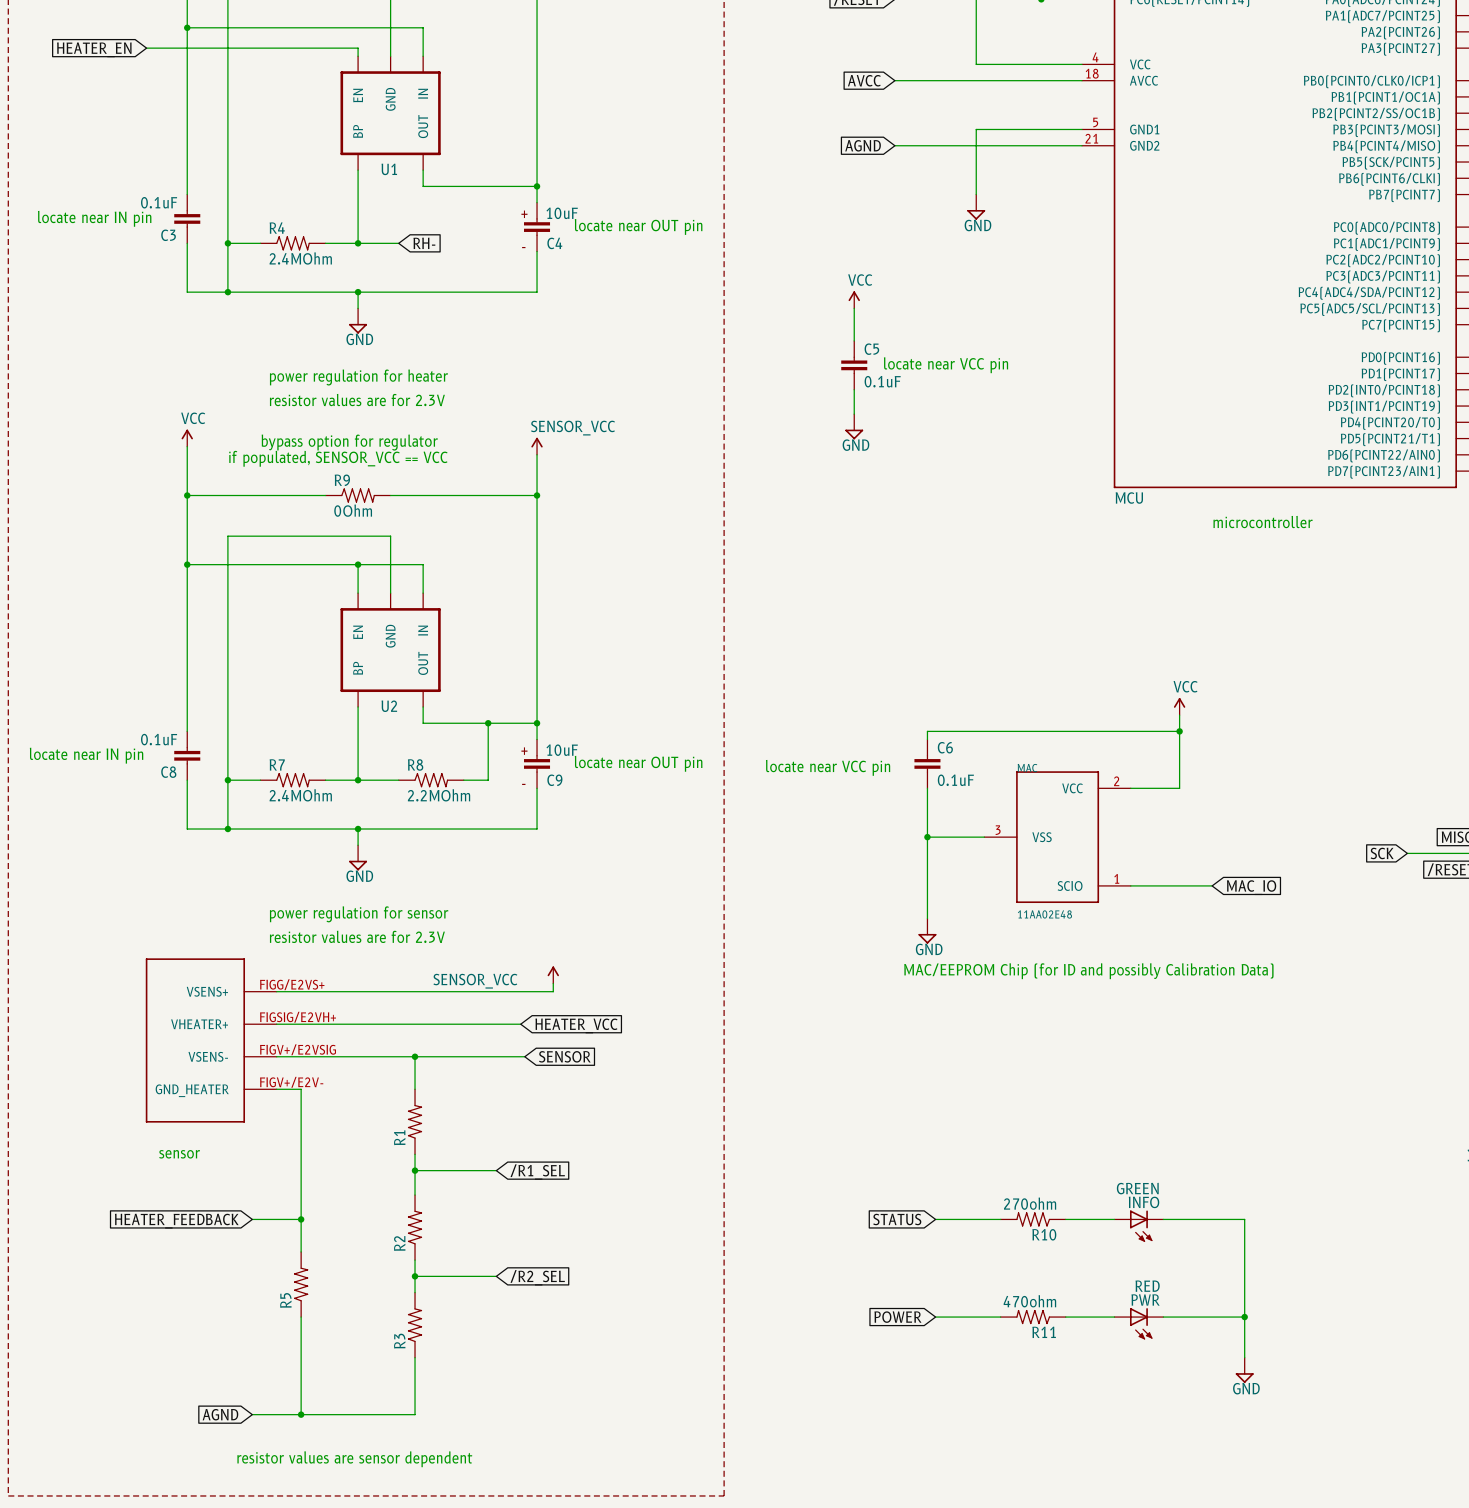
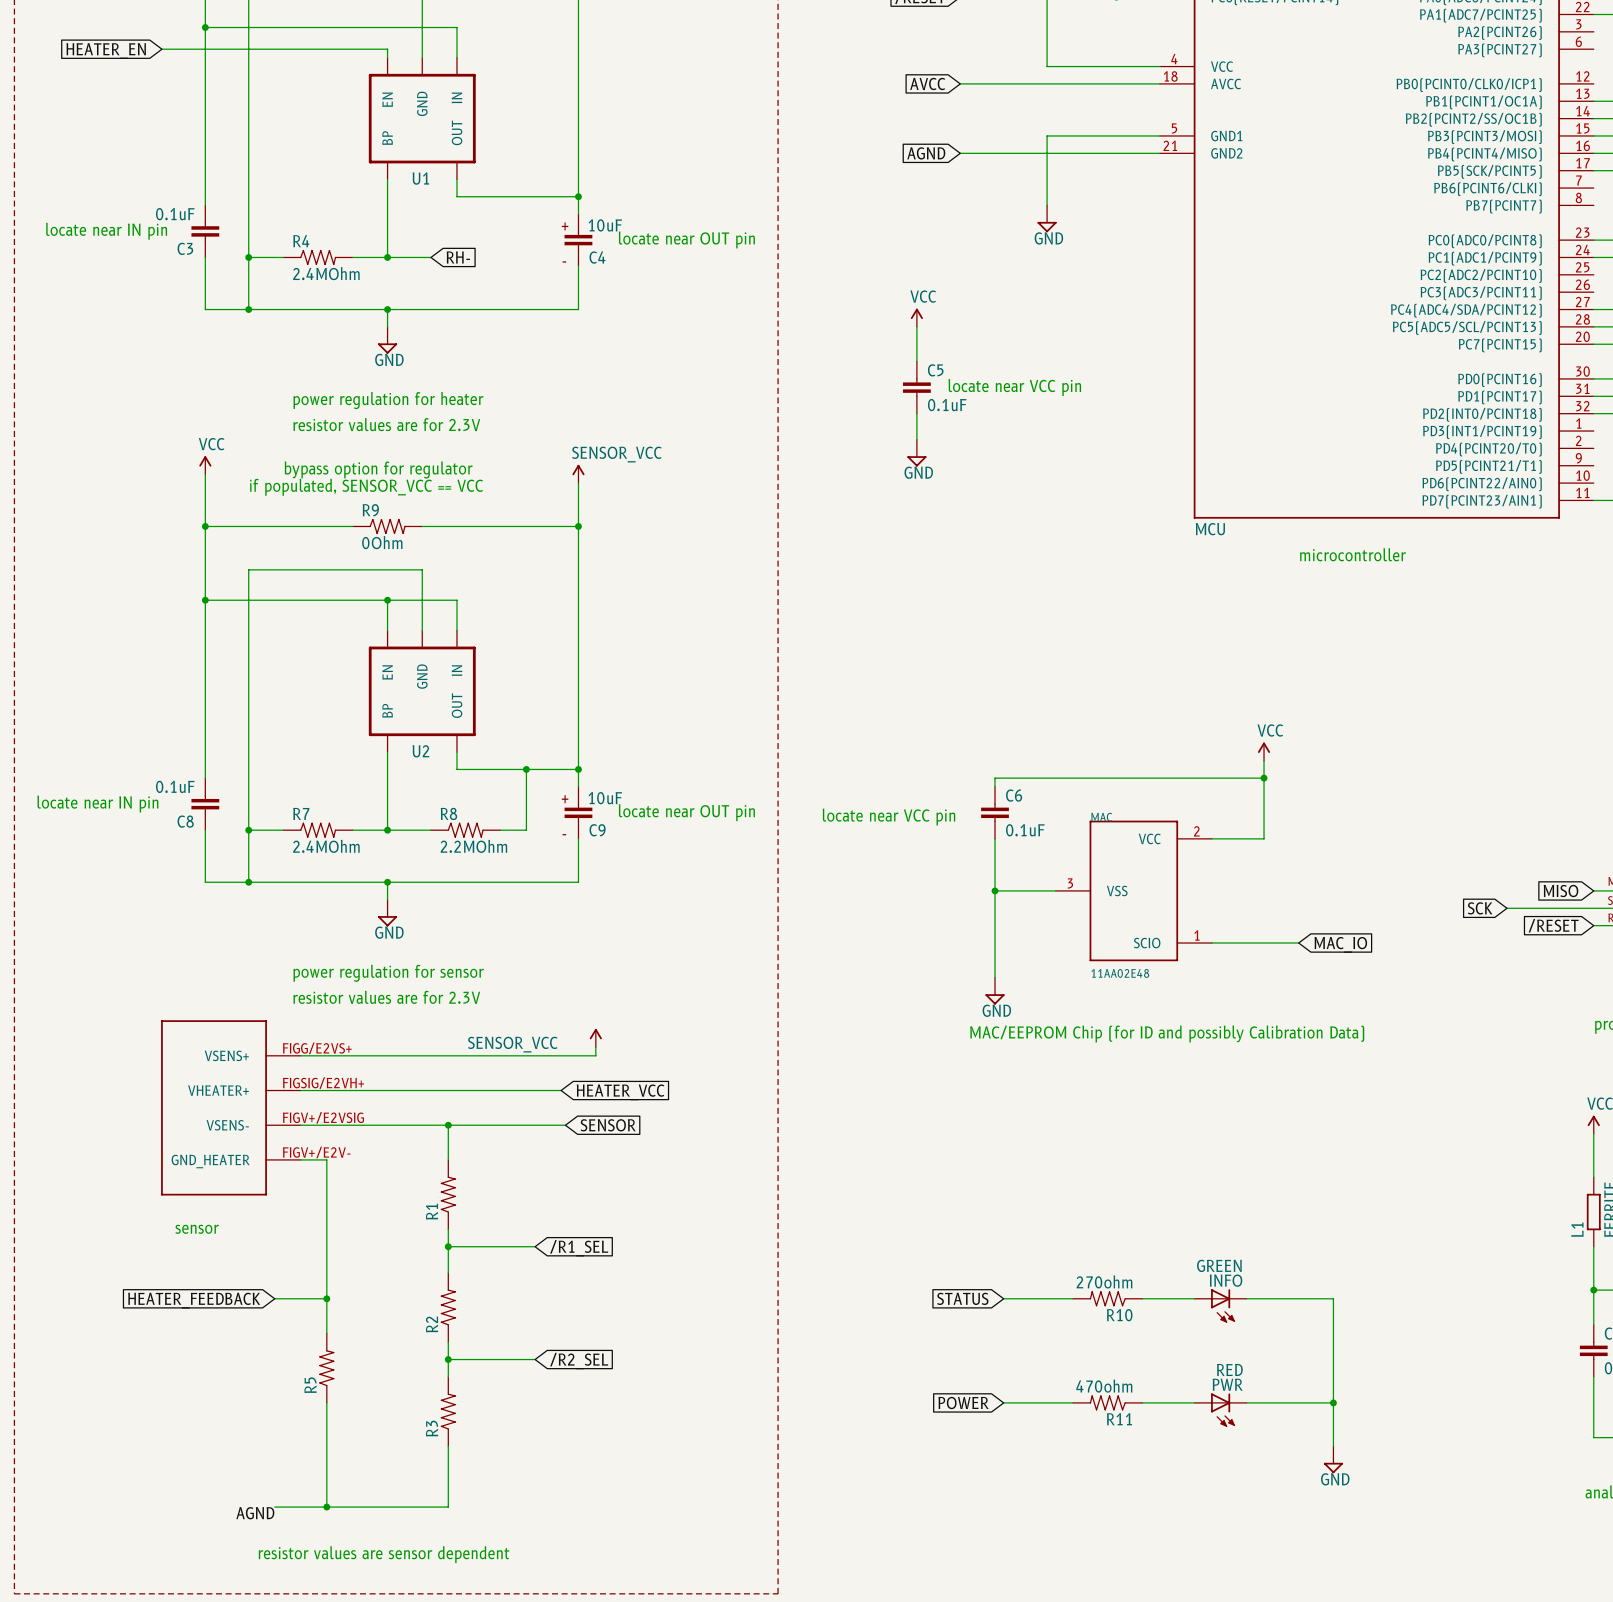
global label: AGND (220, 1414) -> none
label: none -> AGND (255, 1513)

